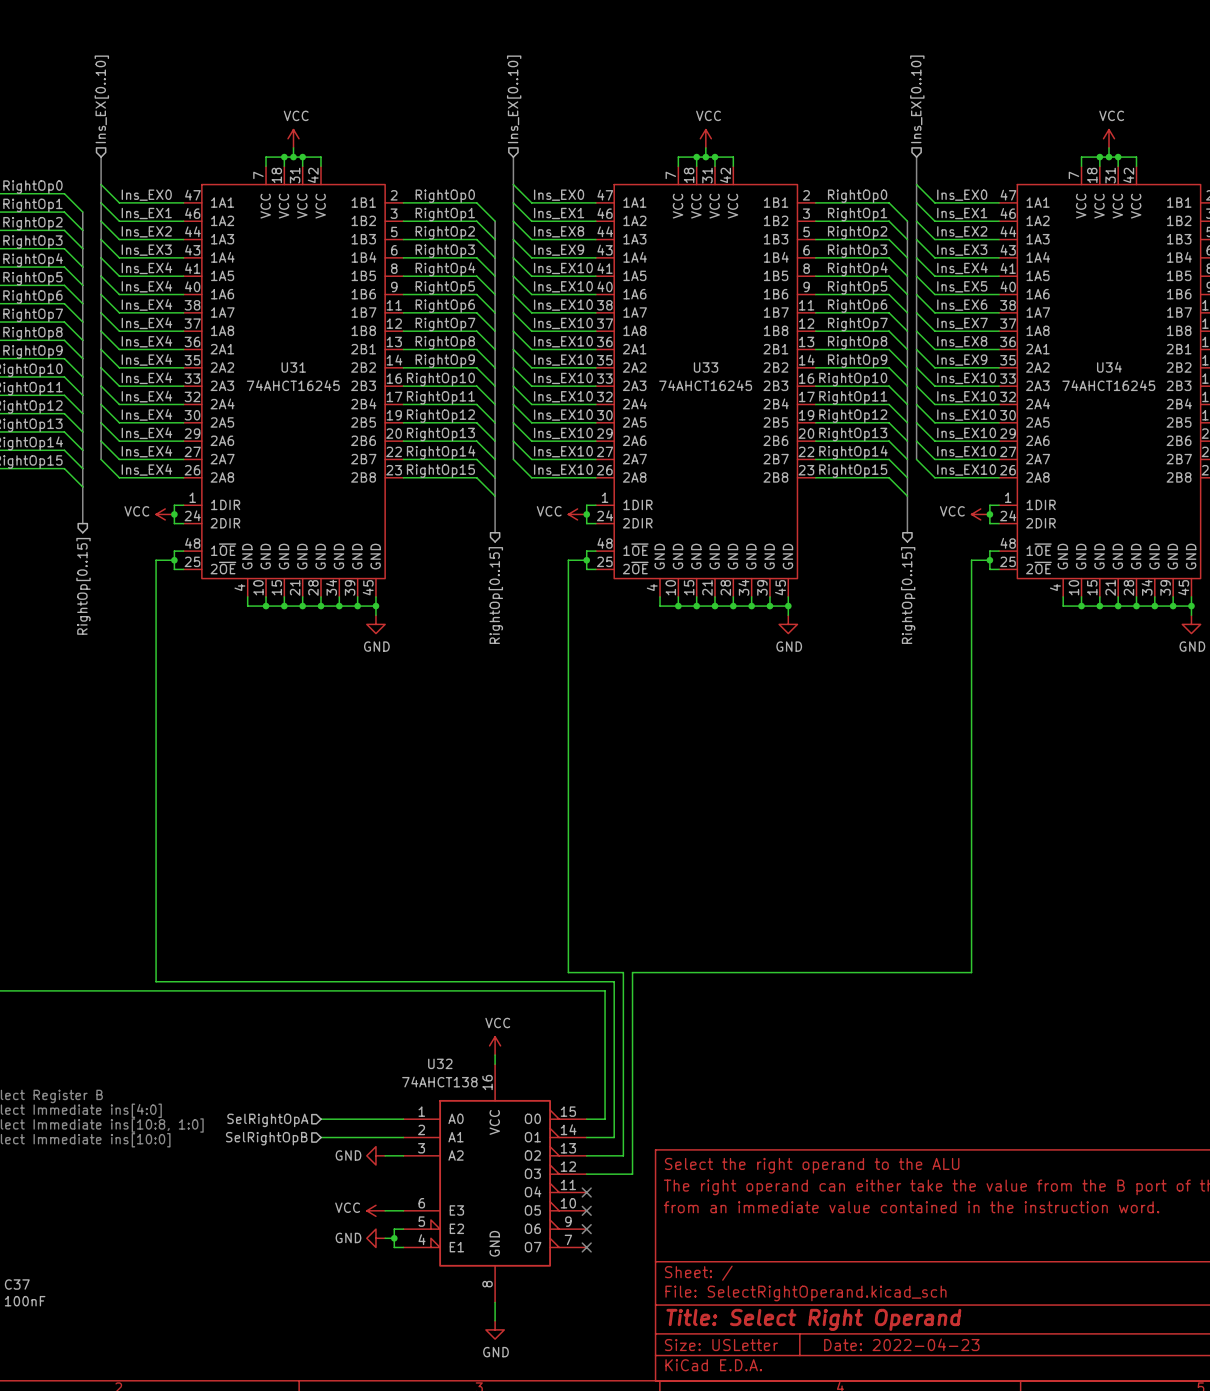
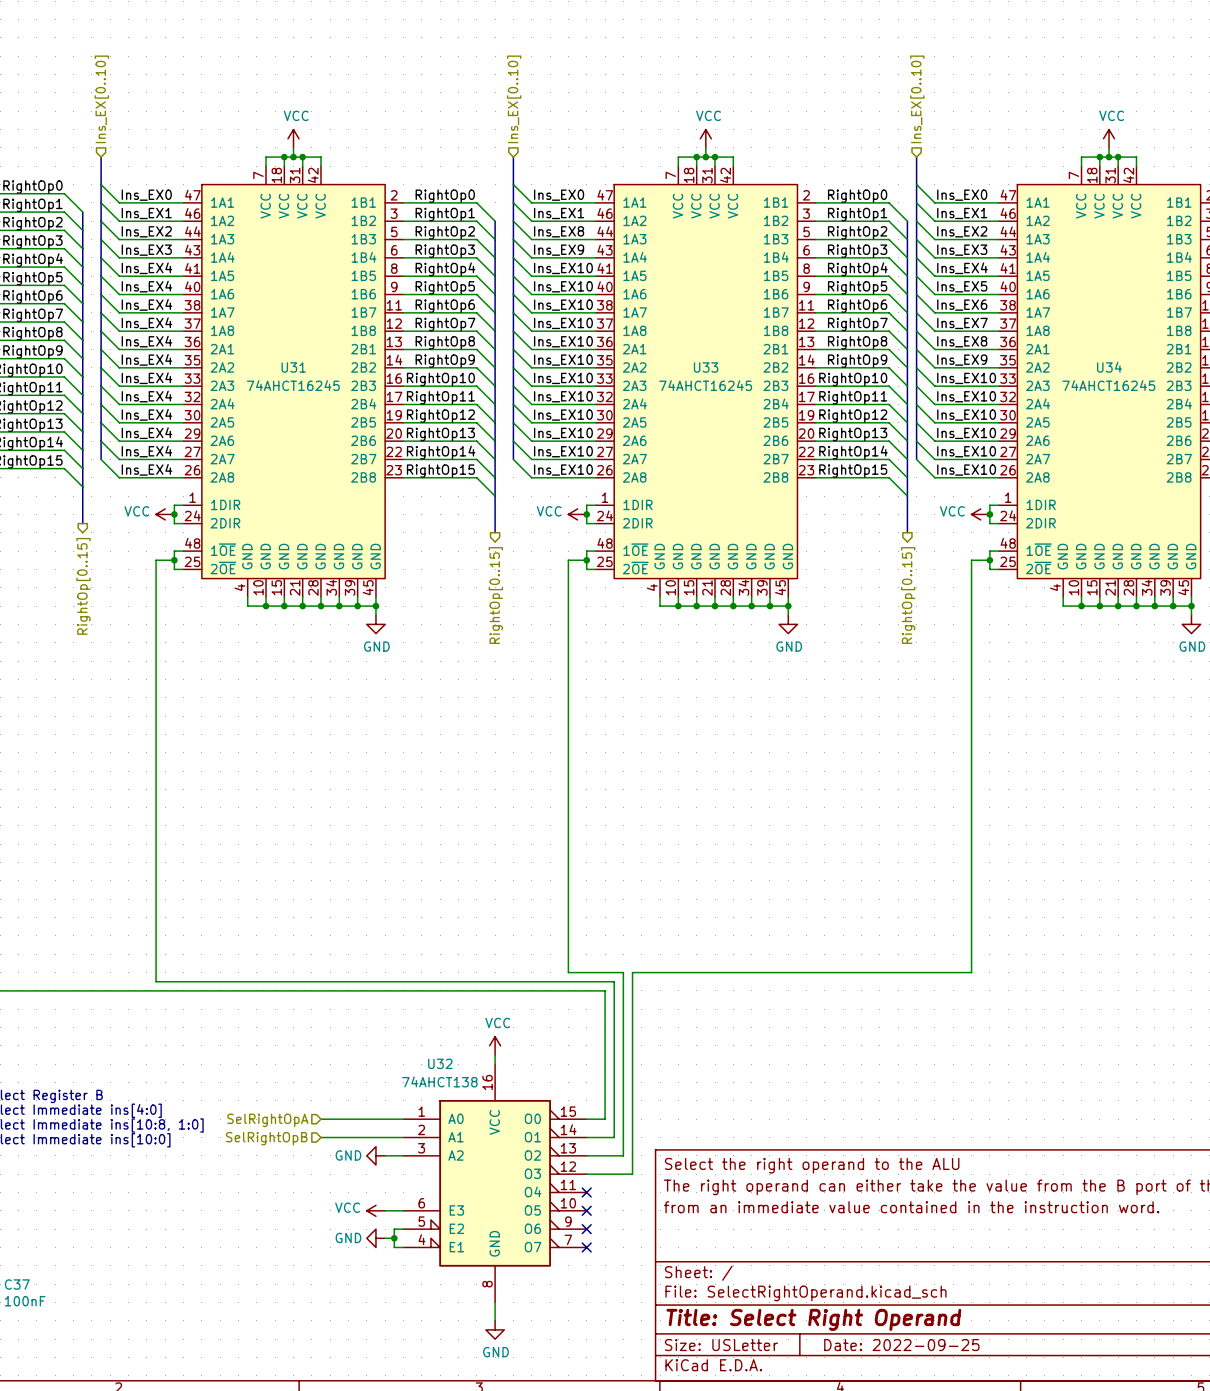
title block: Date: 2022-04-23 (901, 1344) -> Date: 2022-09-25 (901, 1345)

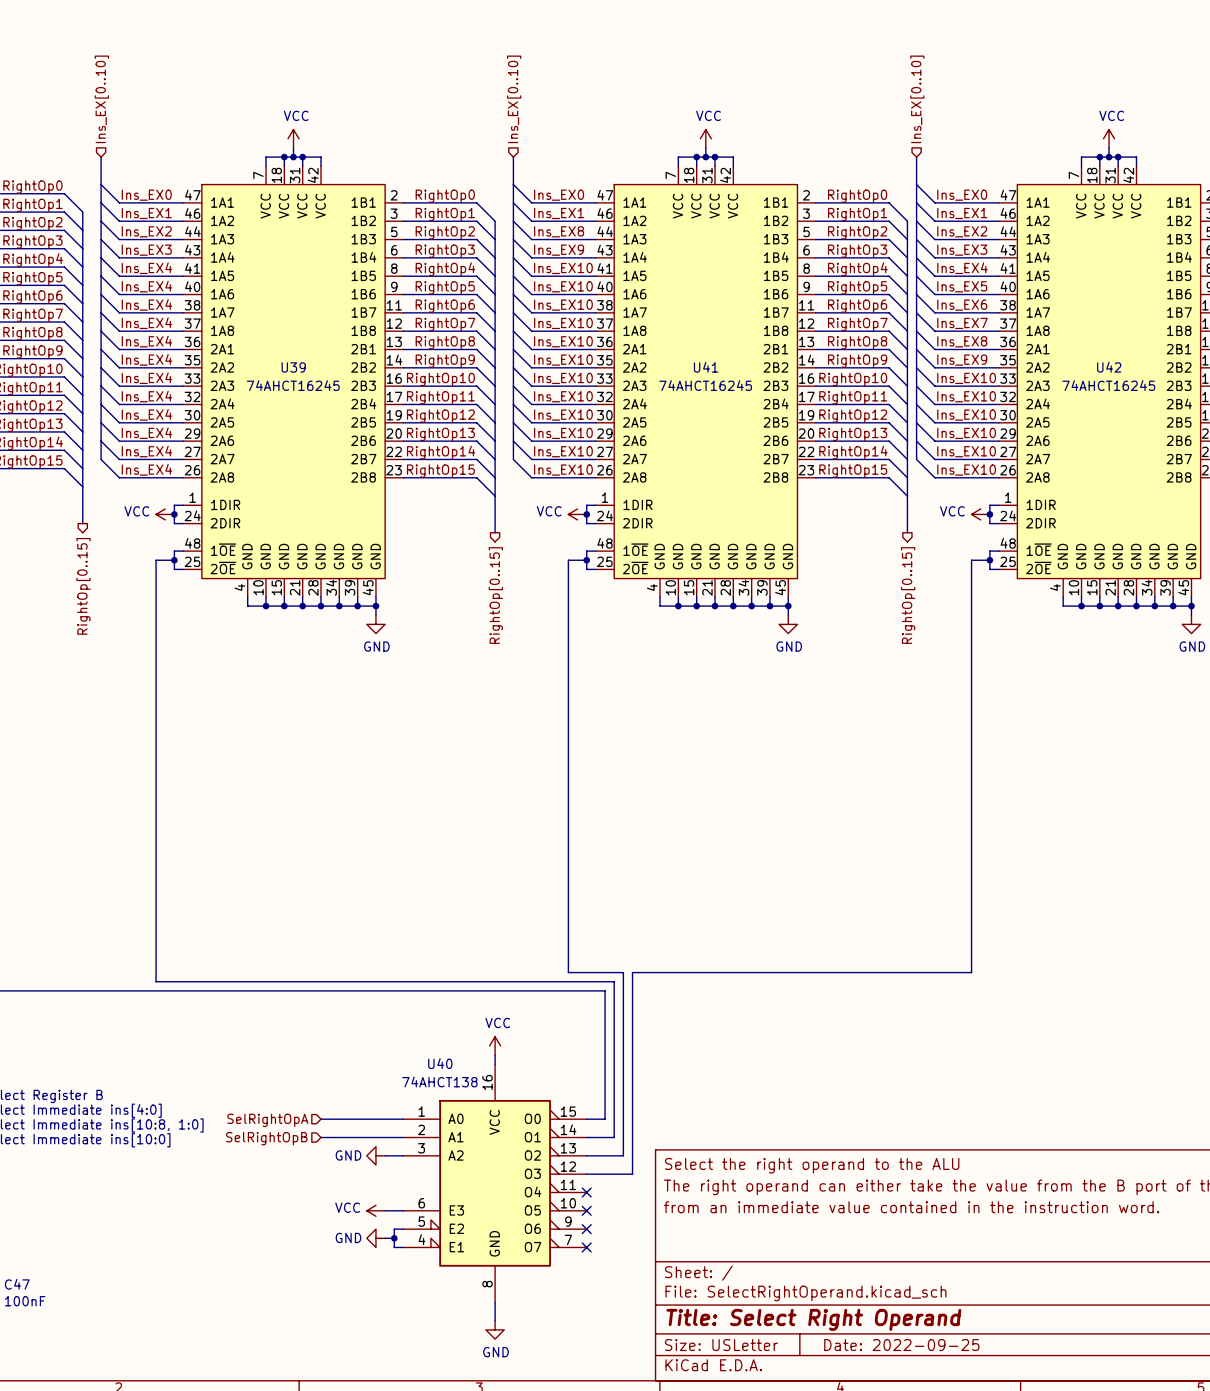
U31 name: U31 (293, 367) -> U39 (293, 367)
U33 name: U33 (706, 367) -> U41 (706, 367)
U34 name: U34 (1109, 367) -> U42 (1109, 367)
U32 name: U32 (440, 1063) -> U40 (440, 1063)
C37 name: C37 (17, 1284) -> C47 (17, 1284)

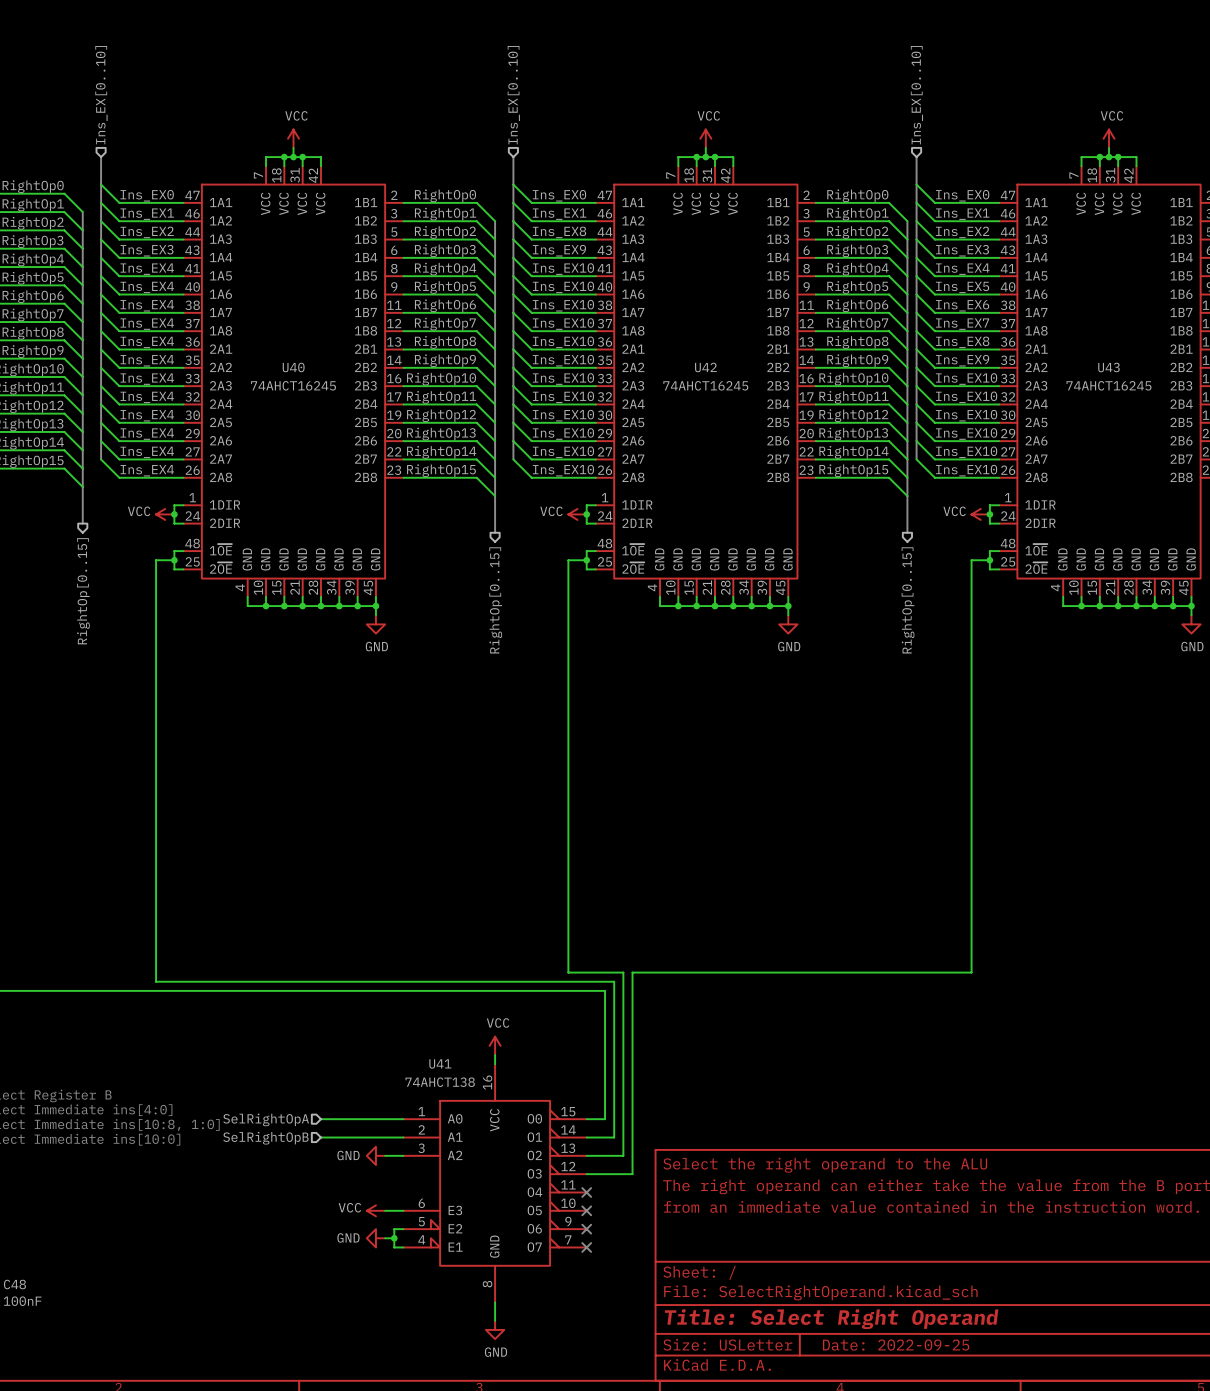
U39 name: U39 (293, 367) -> U40 (293, 367)
U41 name: U41 (706, 367) -> U42 (705, 367)
U42 name: U42 (1109, 367) -> U43 (1108, 367)
U40 name: U40 (440, 1063) -> U41 (440, 1063)
C47 name: C47 (17, 1284) -> C48 (14, 1284)

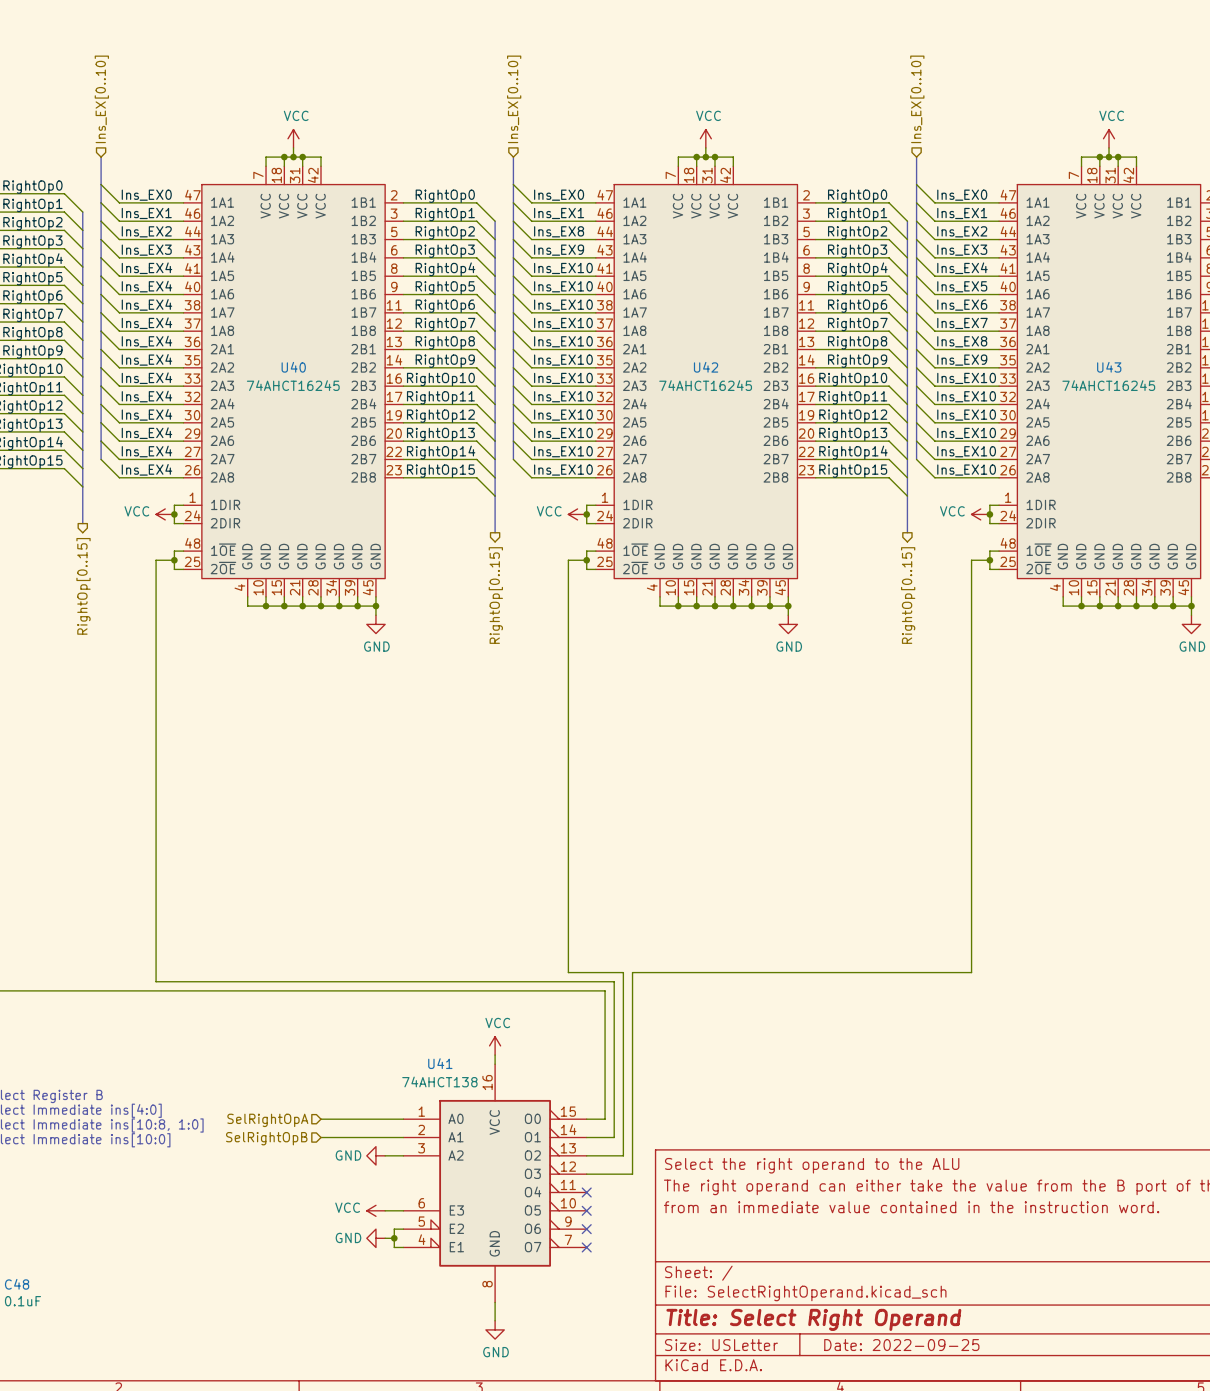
C48 value: 100nF (22, 1301) -> 0.1uF (22, 1301)

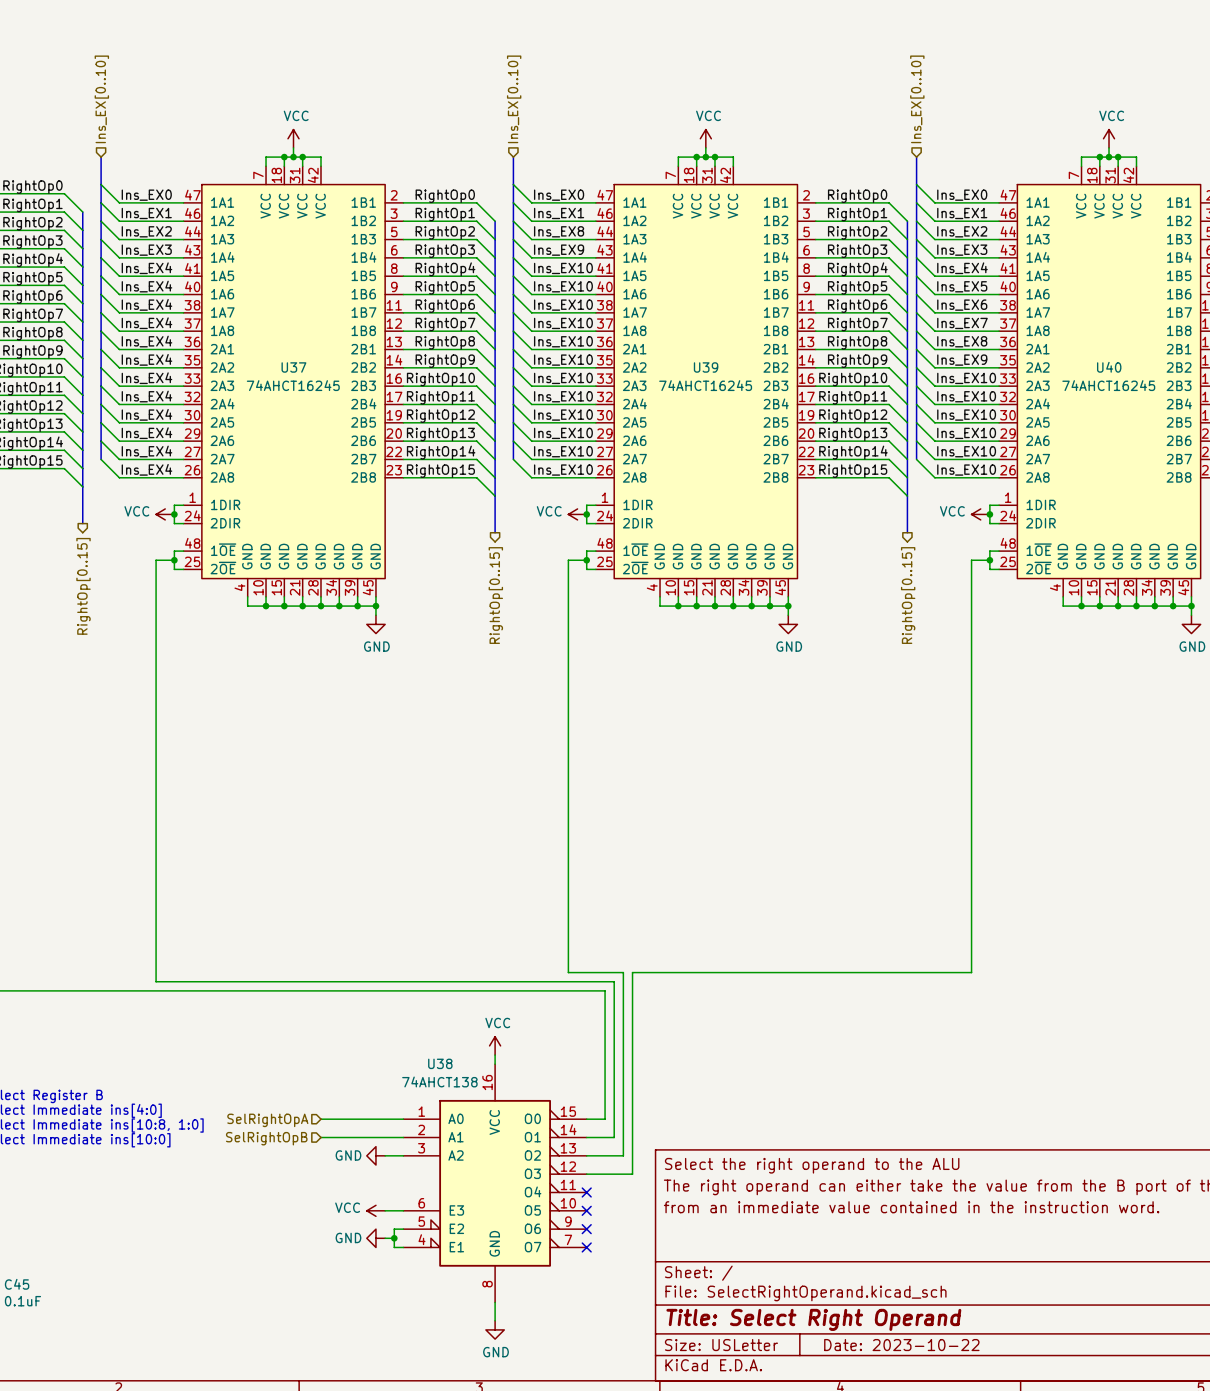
U40 name: U40 (293, 367) -> U37 (293, 367)
U42 name: U42 (706, 367) -> U39 (706, 367)
U43 name: U43 (1109, 367) -> U40 (1109, 367)
U41 name: U41 (440, 1063) -> U38 (440, 1063)
C48 name: C48 (17, 1284) -> C45 (17, 1284)
title block: Date: 2022-09-25 (901, 1345) -> Date: 2023-10-22 (901, 1345)

